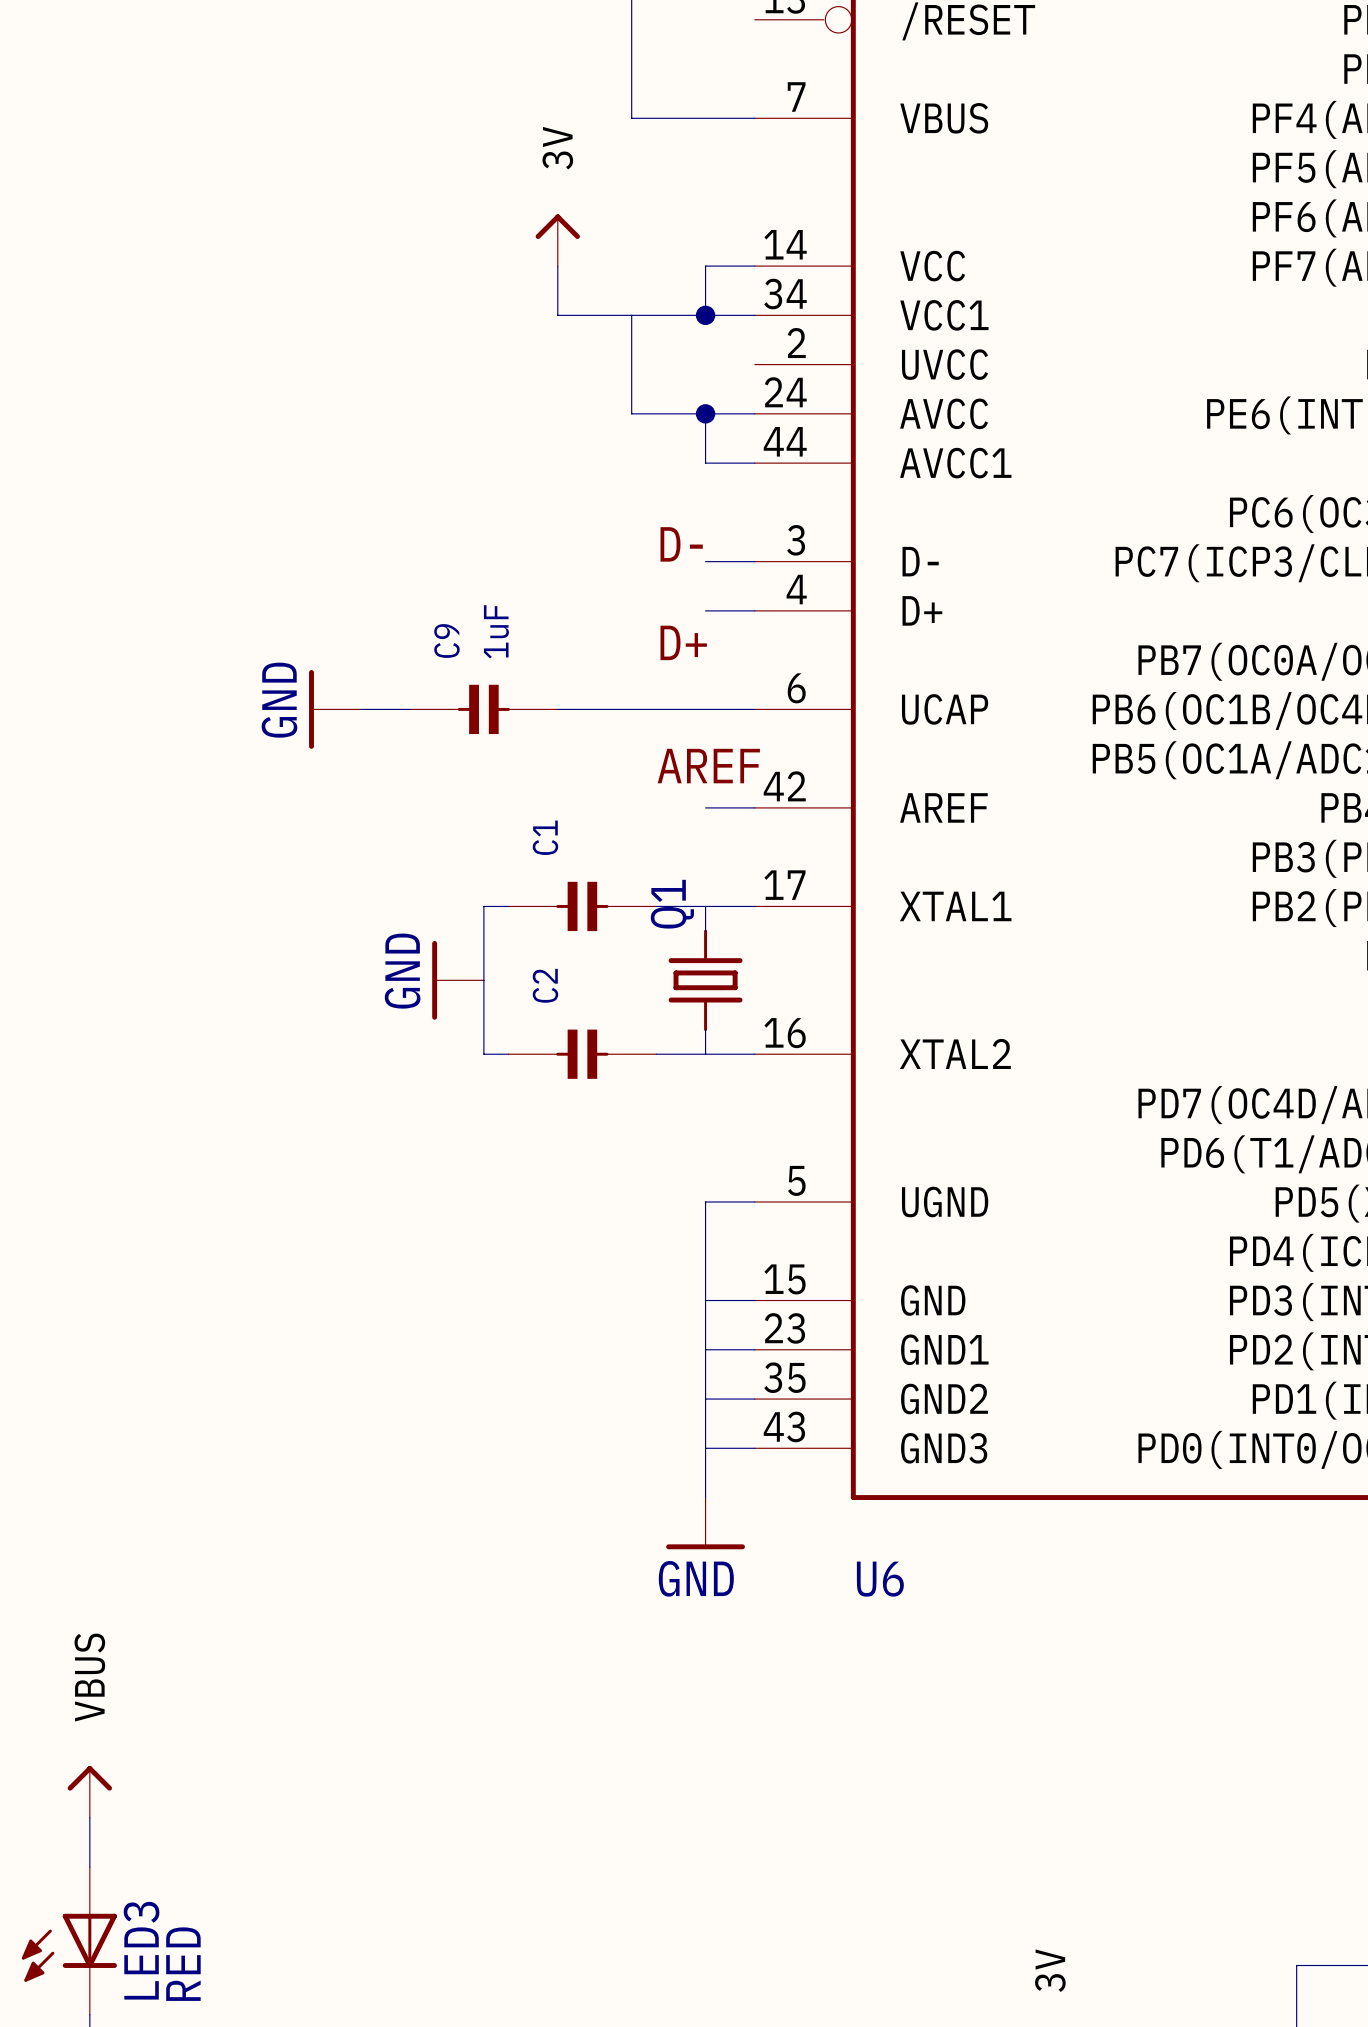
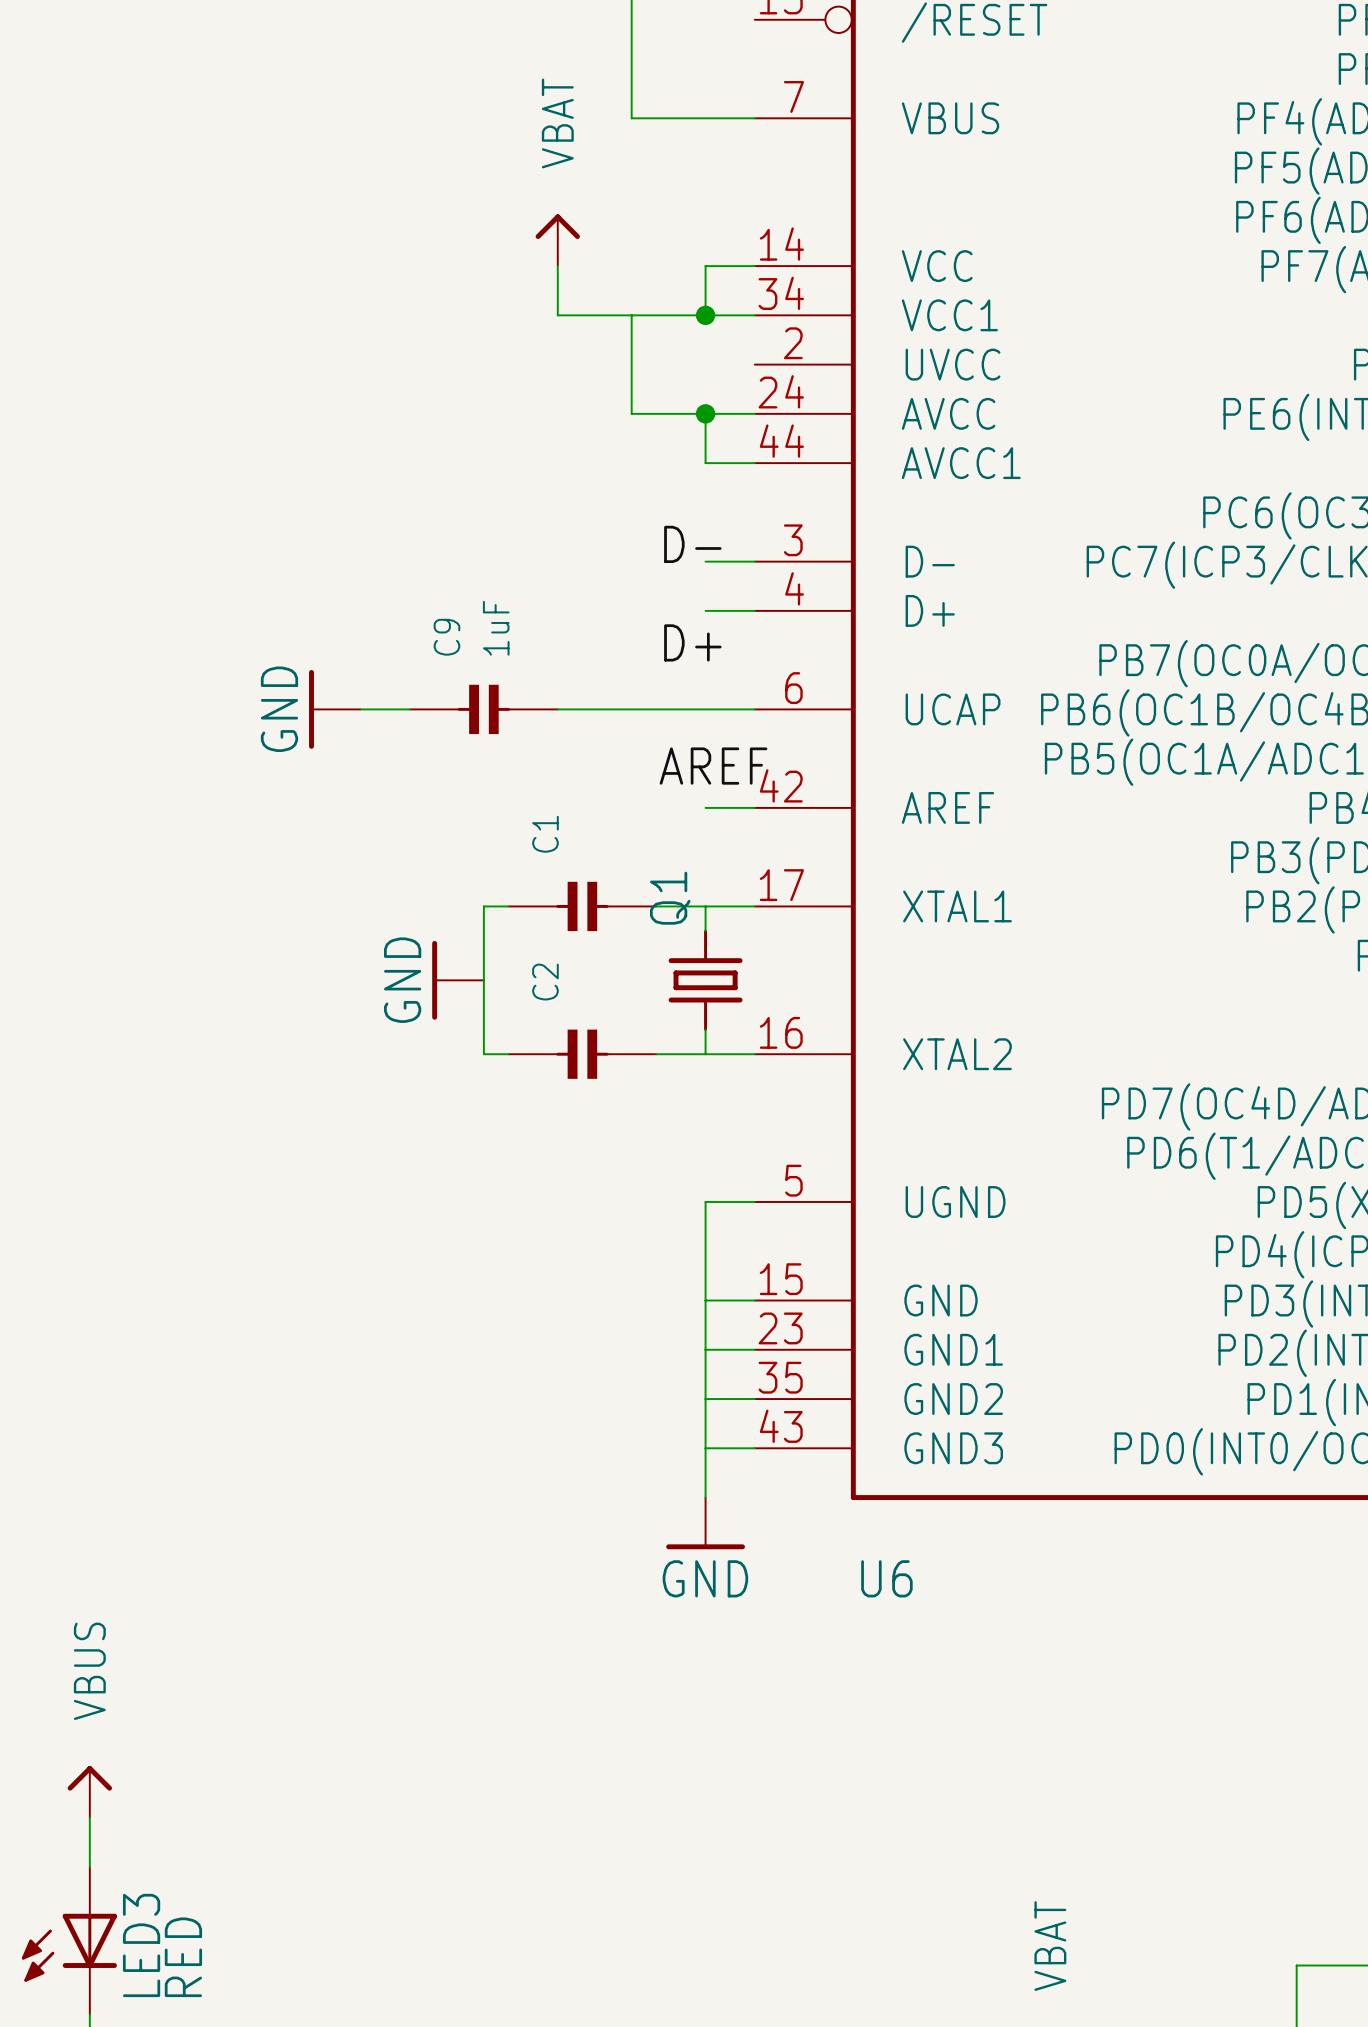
power symbol pin name: 3V (557, 148) -> VBAT (557, 123)
power symbol pin name: 3V (1050, 1970) -> VBAT (1050, 1946)

